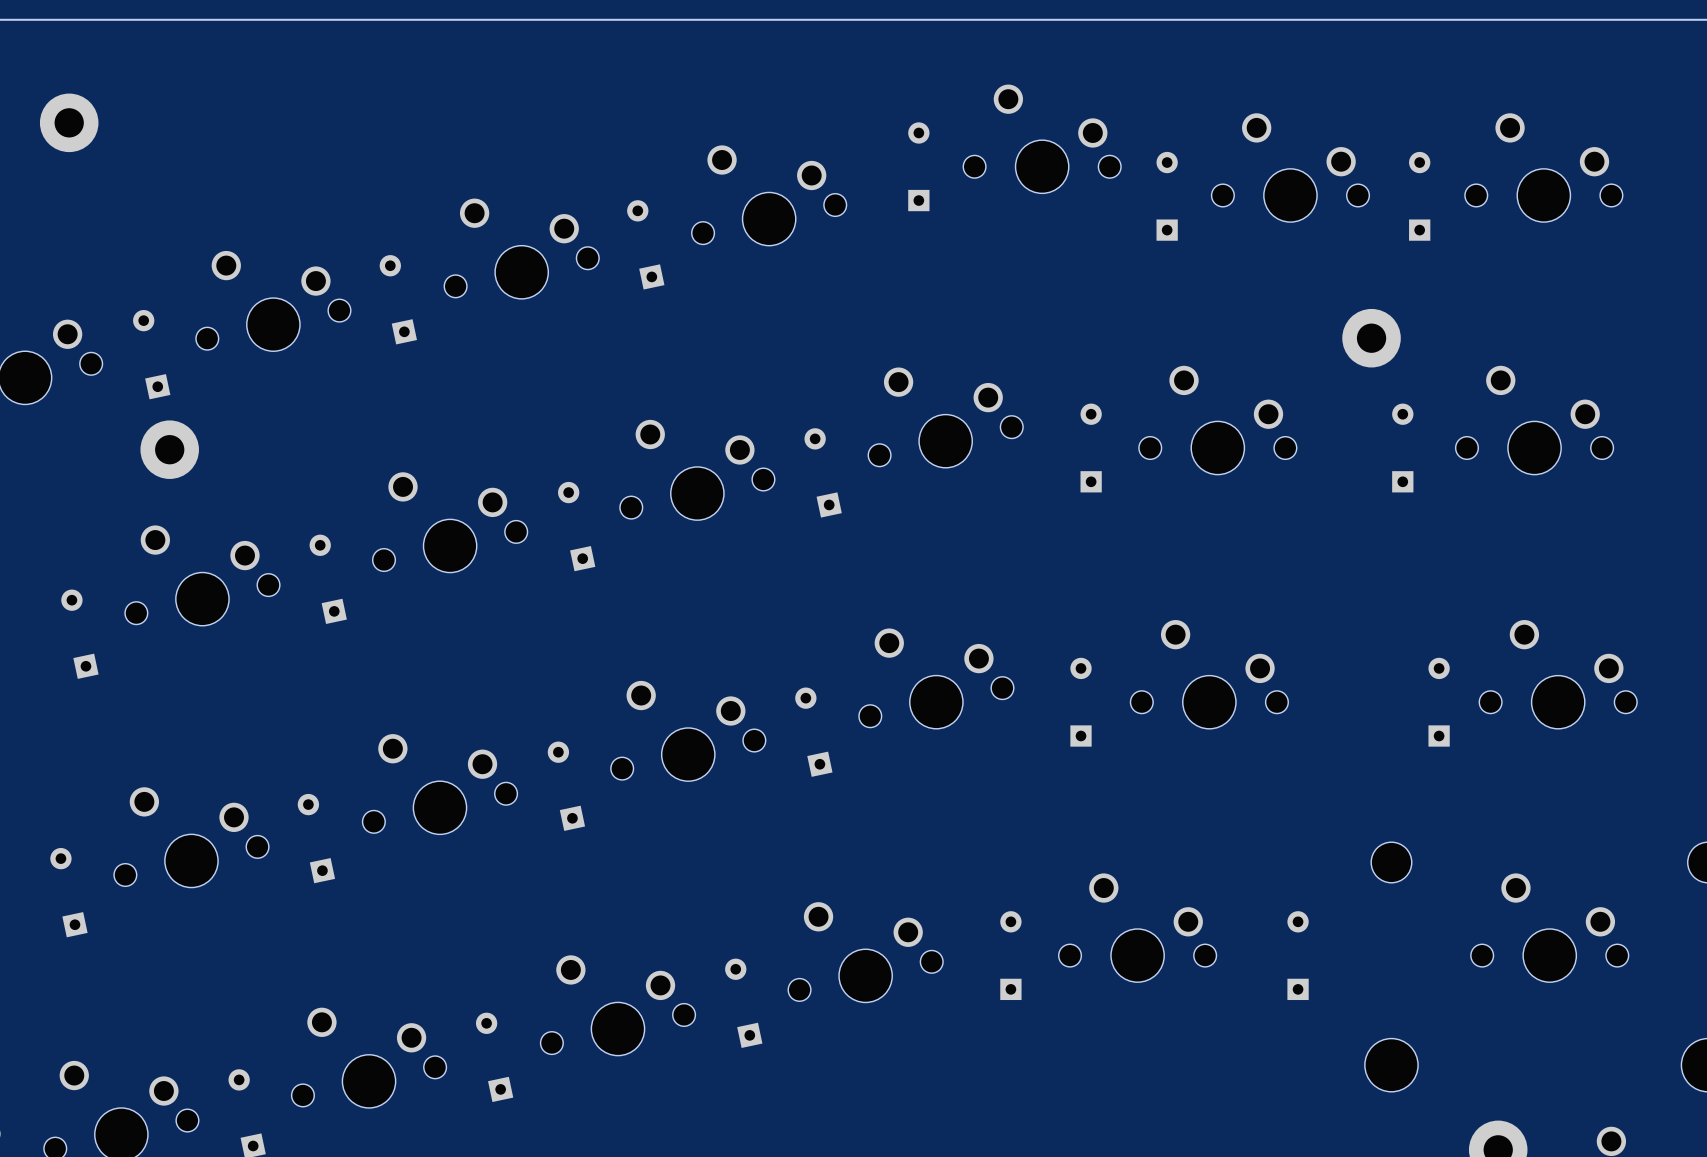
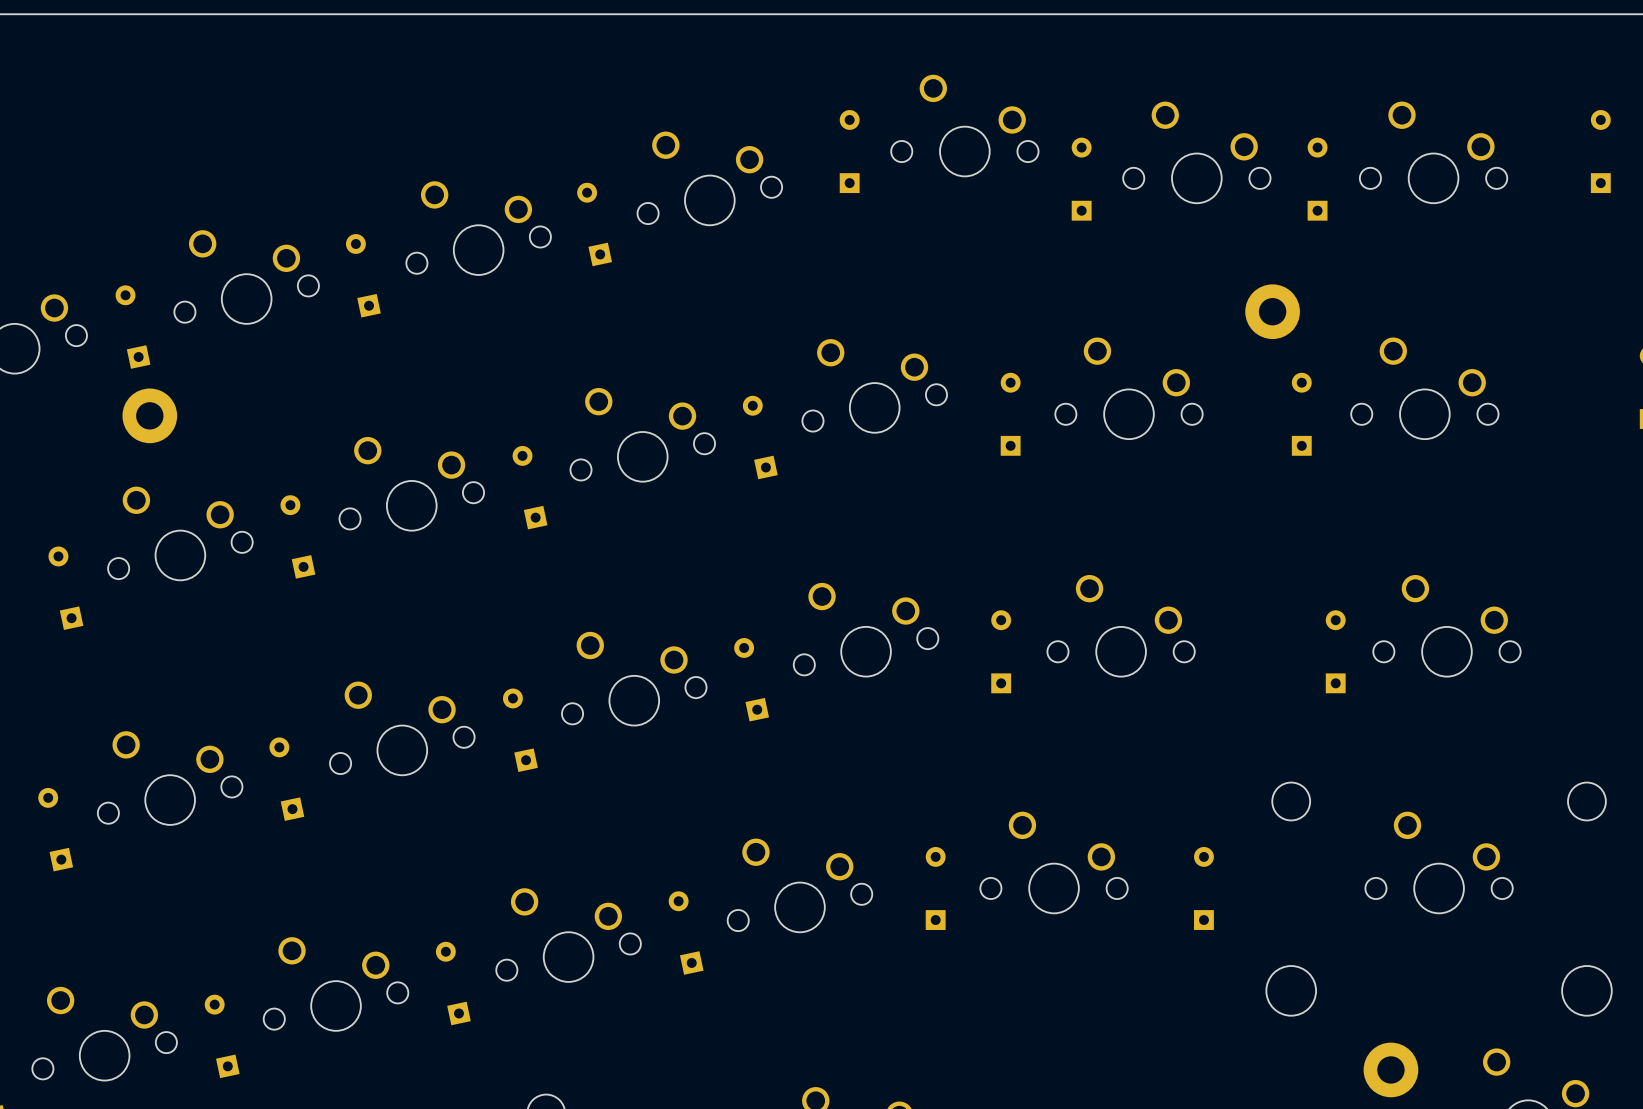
part: (69, 122) -> none

